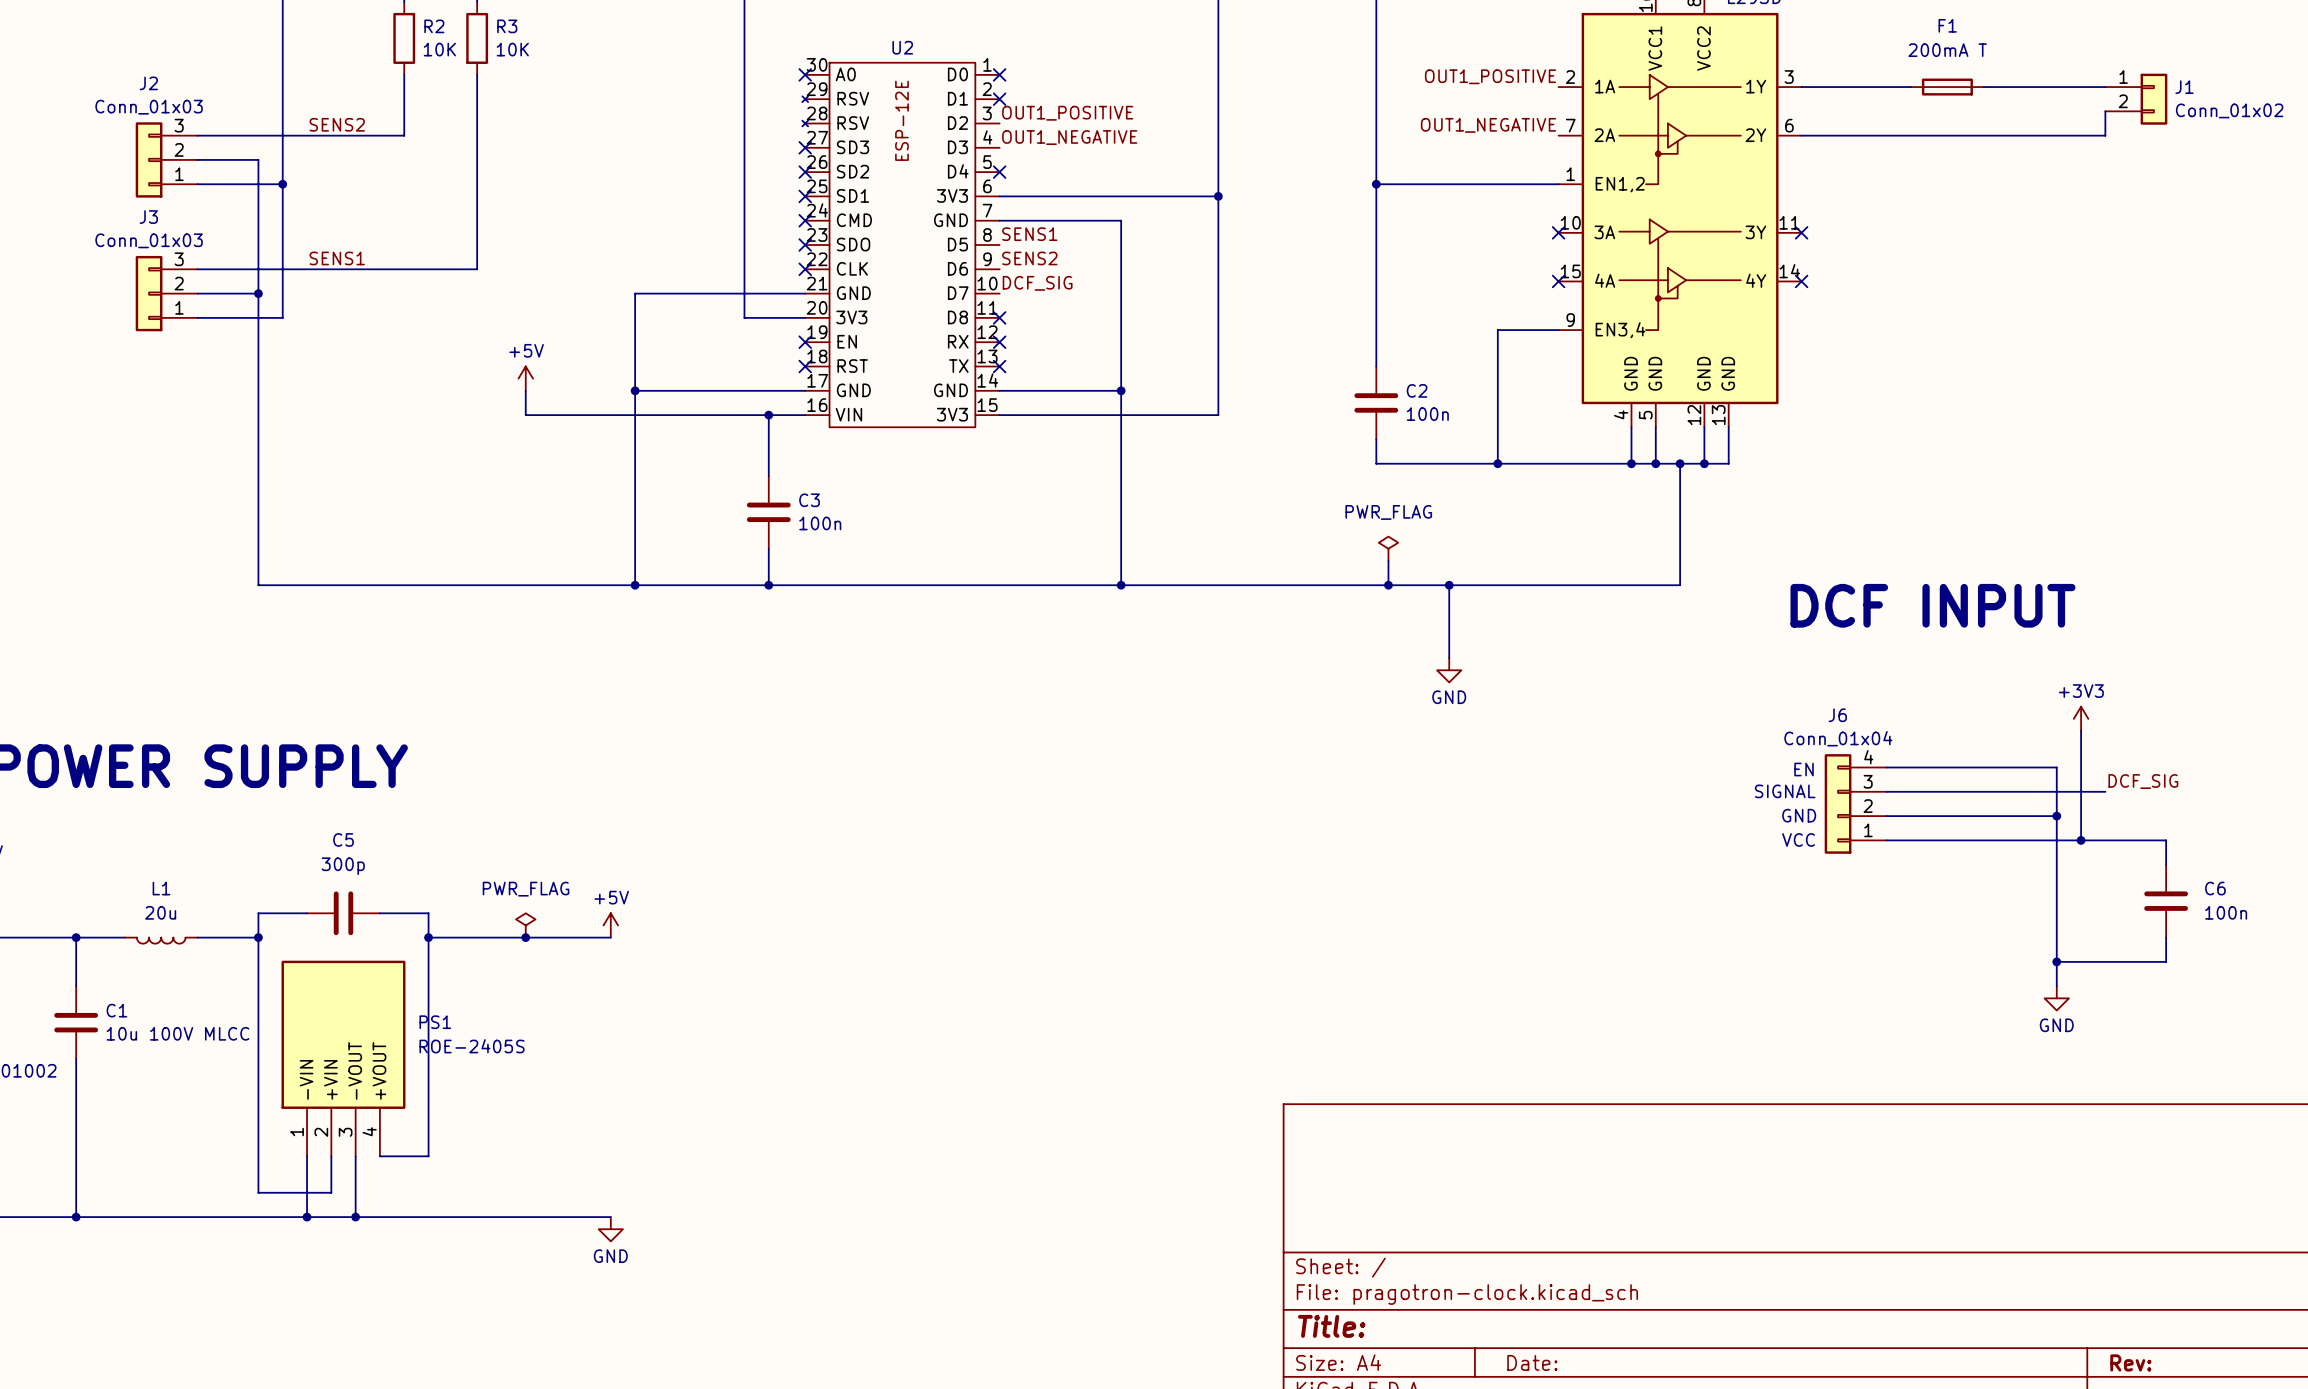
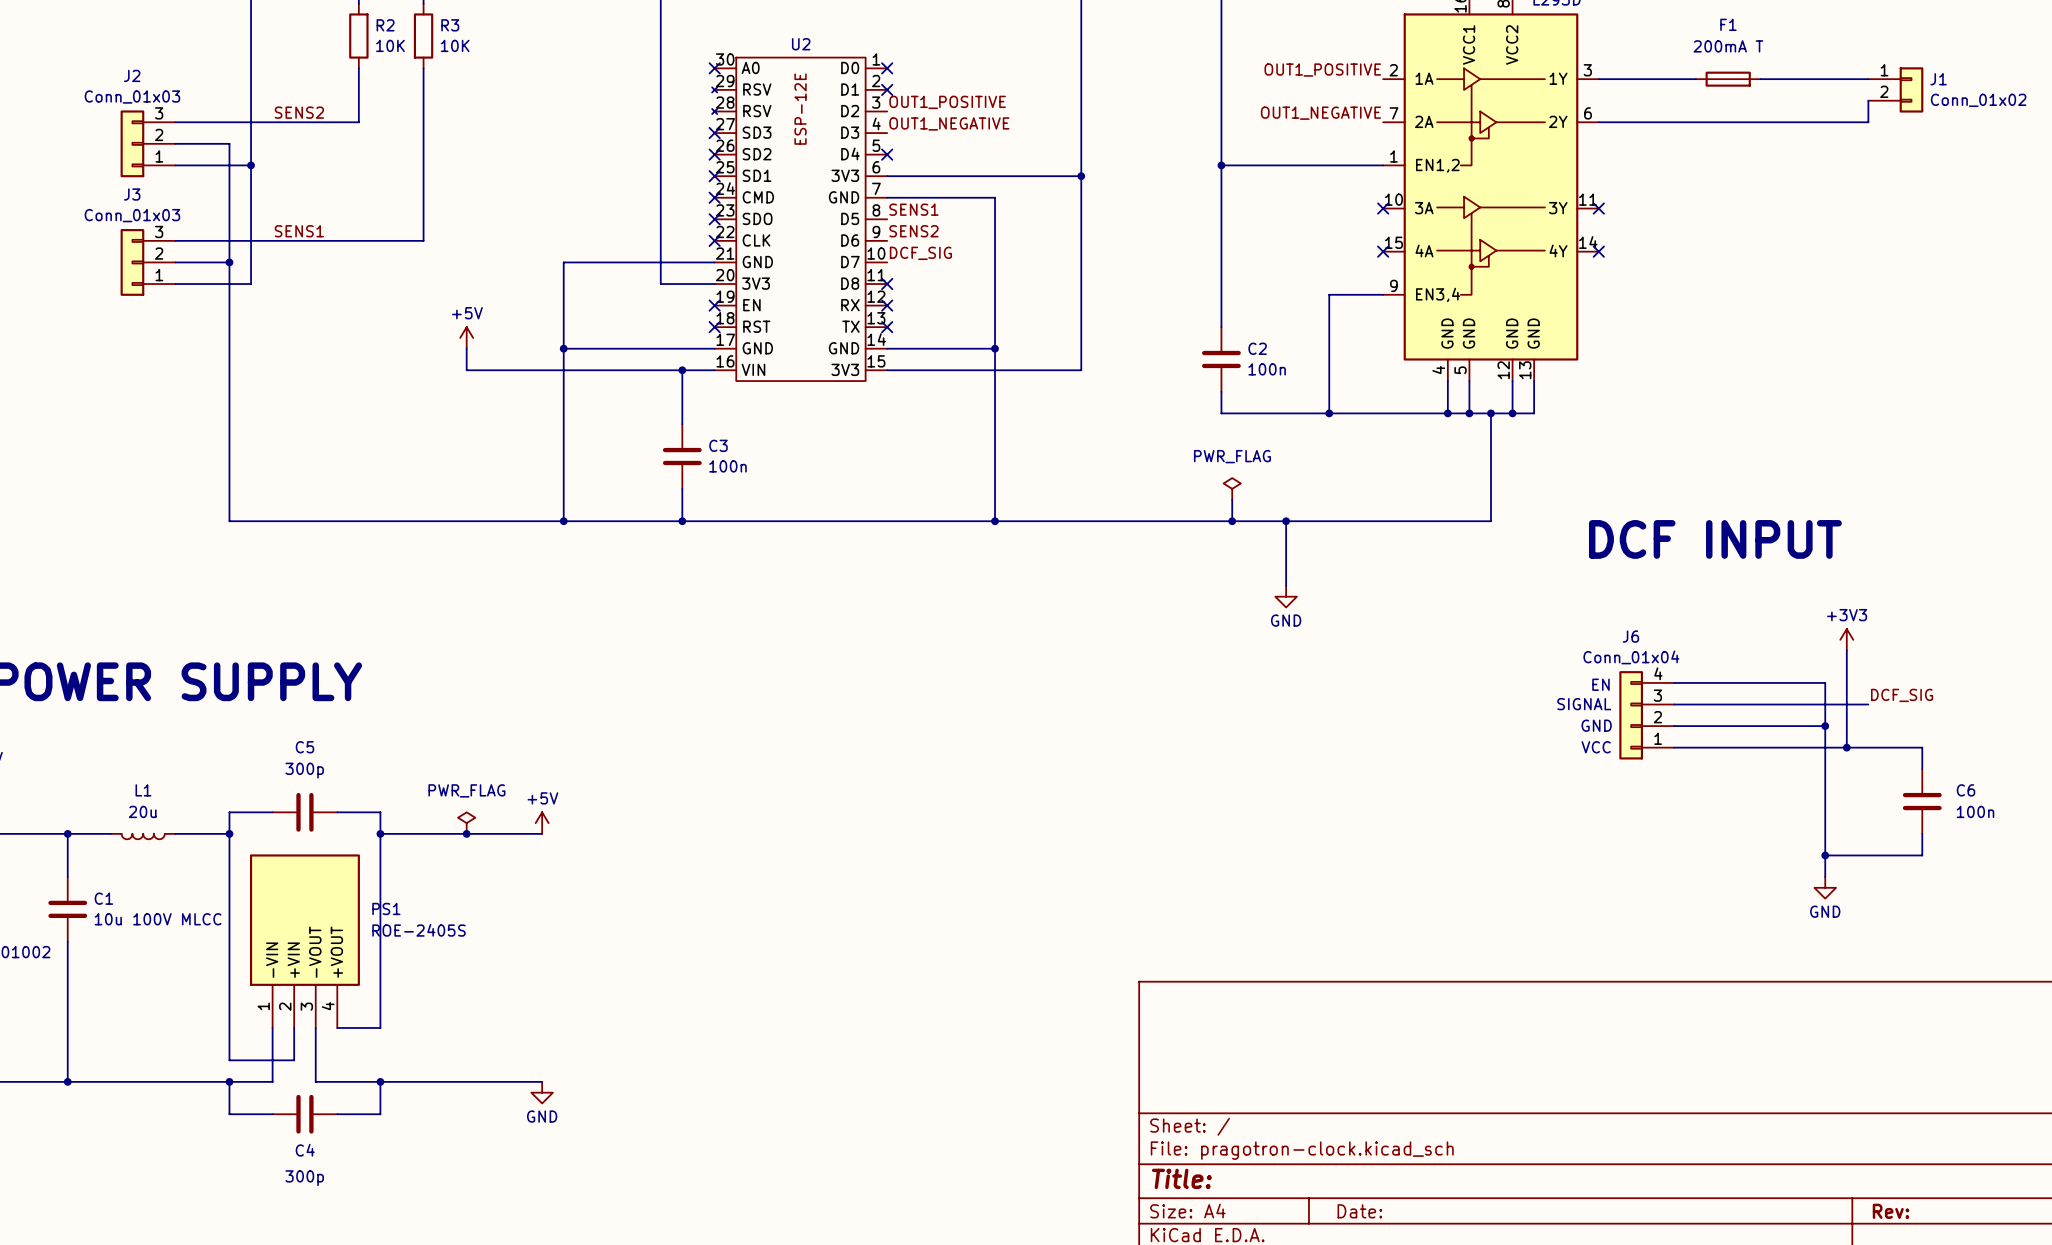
wire: none -> (229, 1081) (229, 1114) (272, 1114)
junction: none -> (229, 1081)
wire: (307, 1217) (355, 1217) -> none
junction: (307, 1217) -> none
junction: (355, 1217) -> none
wire: none -> (380, 1081) (380, 1114) (337, 1114)
junction: none -> (380, 1081)
C4: none -> 300p (304, 1114)

